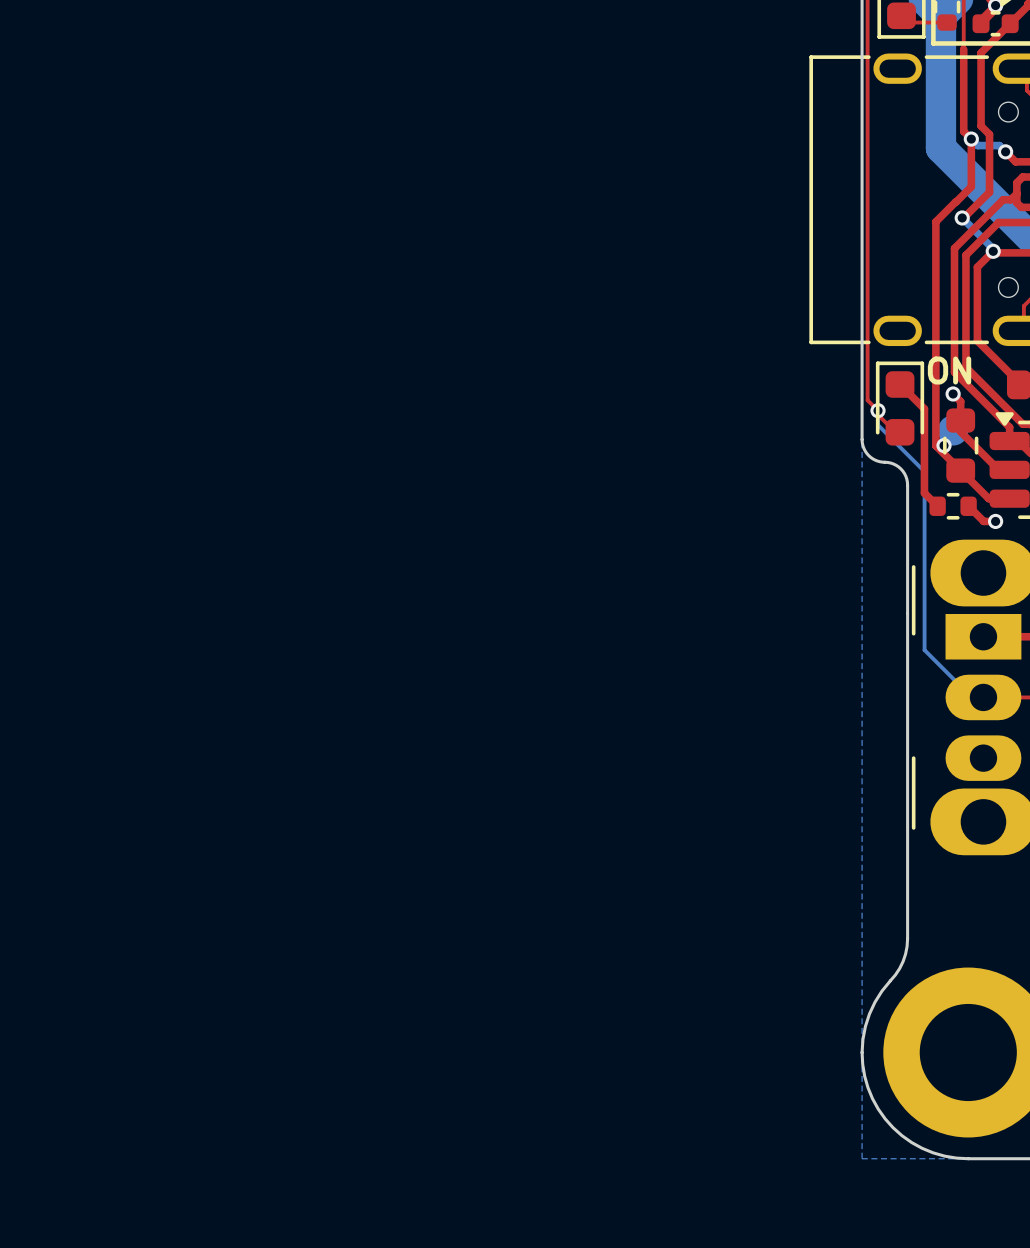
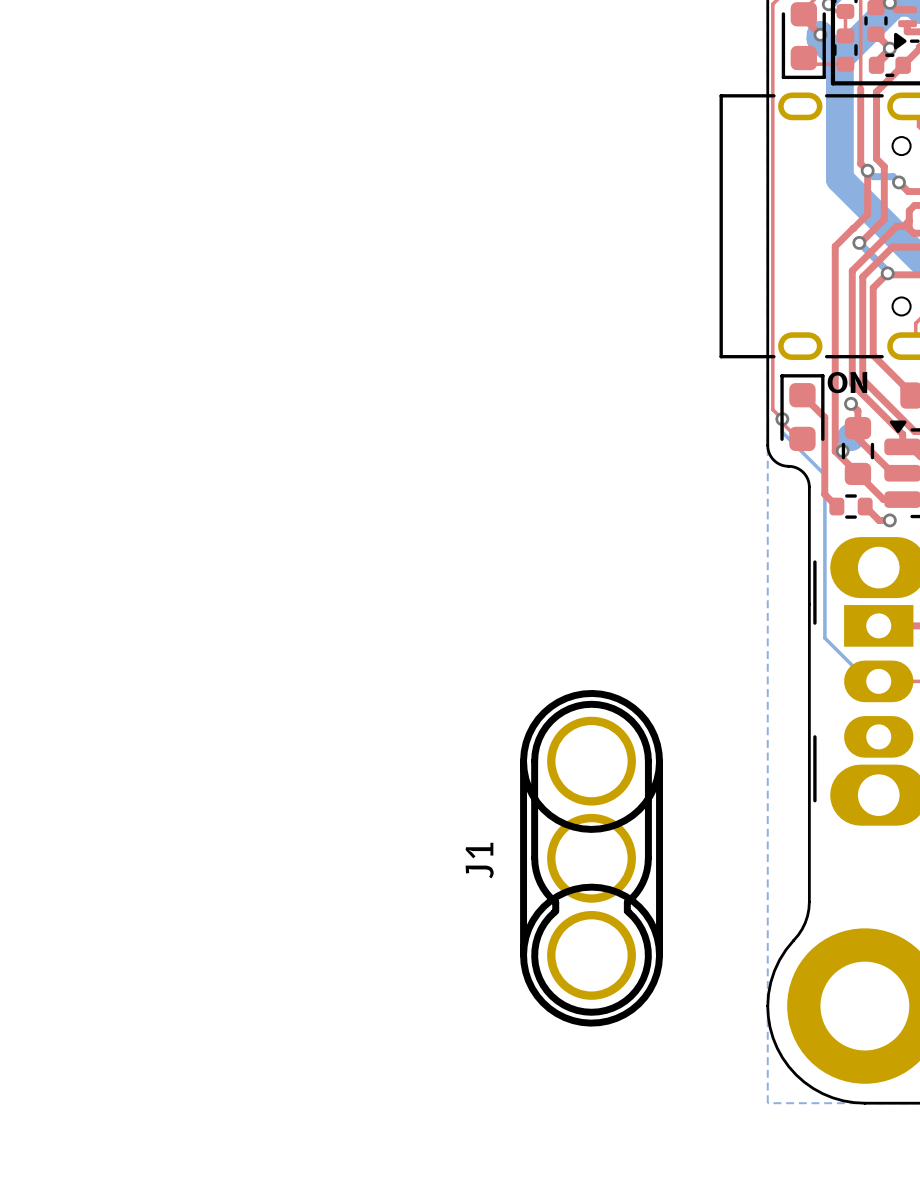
J1: none -> (591, 858)

